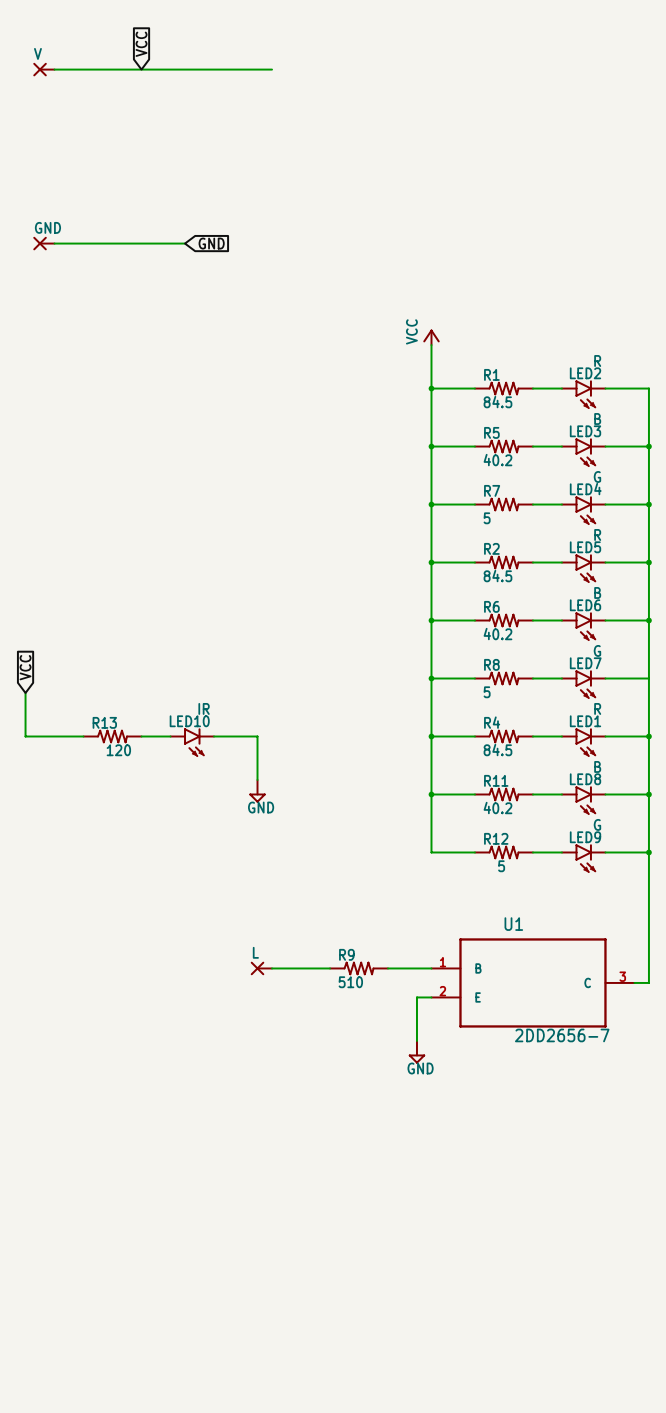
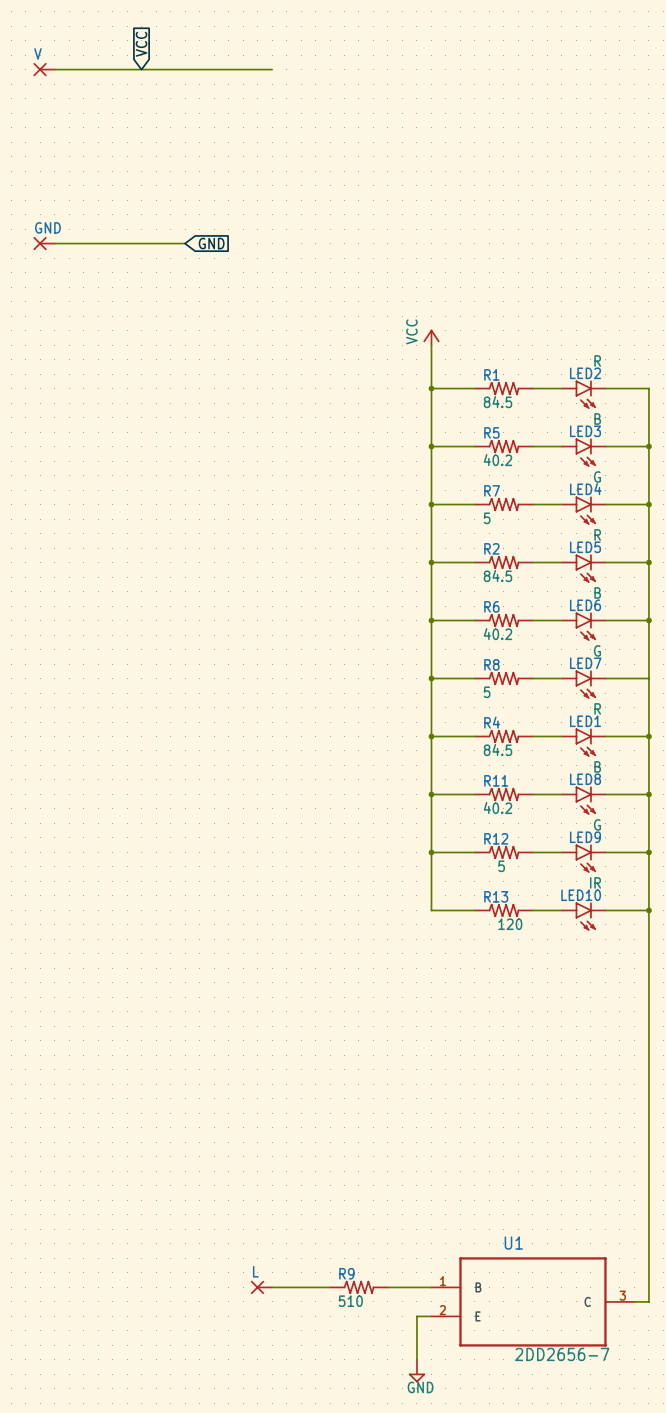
global label: VCC (25, 667) -> none
wire: (25, 693) (25, 736) (83, 736) -> none
R13 position: (112, 736) -> (503, 910)
wire: (141, 736) (170, 736) -> none
wire: (214, 736) (257, 736) (257, 779) -> none
LED10 position: (192, 742) -> (583, 916)
power symbol: GND (257, 791) -> none
wire: none -> (431, 852) (431, 910) (474, 910)
junction: none -> (431, 852)
wire: none -> (532, 910) (561, 910)
wire: none -> (605, 910) (648, 910)
junction: none -> (648, 910)
L: (261, 968) -> none
wire: (272, 968) (330, 968) -> none
R9 position: (358, 968) -> (358, 1287)
wire: (387, 968) (431, 968) -> none
U1 position: (532, 982) -> (532, 1301)
wire: (634, 982) (648, 982) -> (634, 1301) (648, 1301) (648, 982)
wire: (431, 997) (416, 997) (416, 1040) -> none
power symbol: GND (416, 1052) -> none
L: none -> (261, 1287)
wire: none -> (272, 1287) (330, 1287)
wire: none -> (387, 1287) (431, 1287)
wire: none -> (431, 1316) (416, 1316) (416, 1359)
power symbol: none -> GND (416, 1371)

